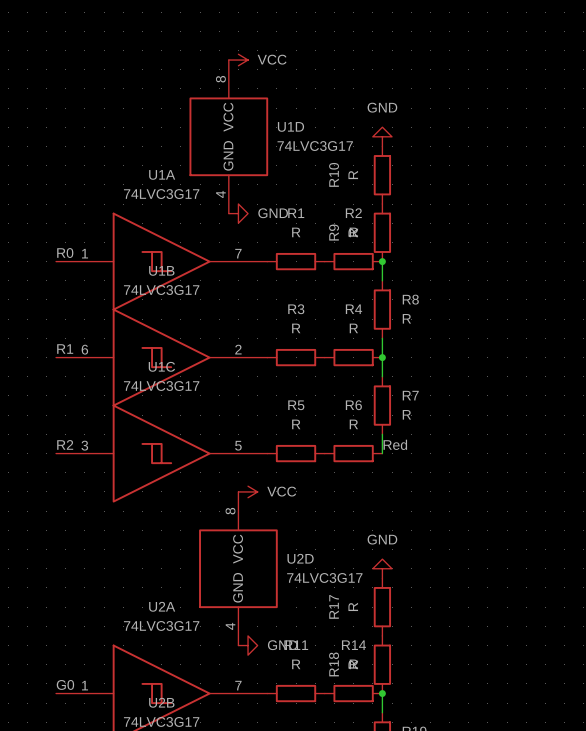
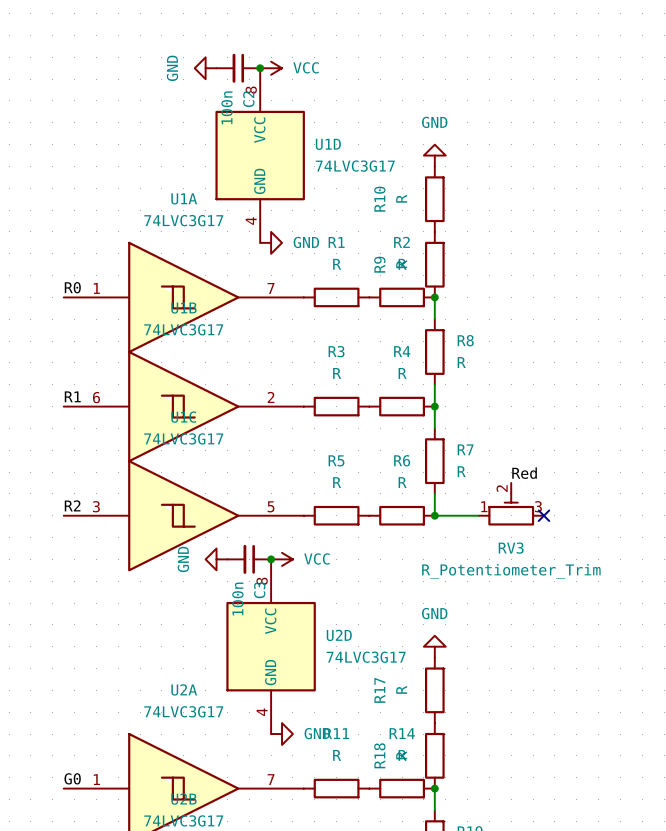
power symbol: none -> GND (205, 68)
C2: none -> 100n (238, 68)
junction: none -> (260, 68)
RV3: none -> R_Potentiometer_Trim (511, 504)
label position: Red (395, 444) -> Red (524, 473)
wire: none -> (434, 515) (478, 515)
junction: none -> (434, 515)
no-connect mark: none -> (543, 515)
power symbol: none -> GND (216, 559)
C3: none -> 100n (249, 559)
junction: none -> (271, 559)

